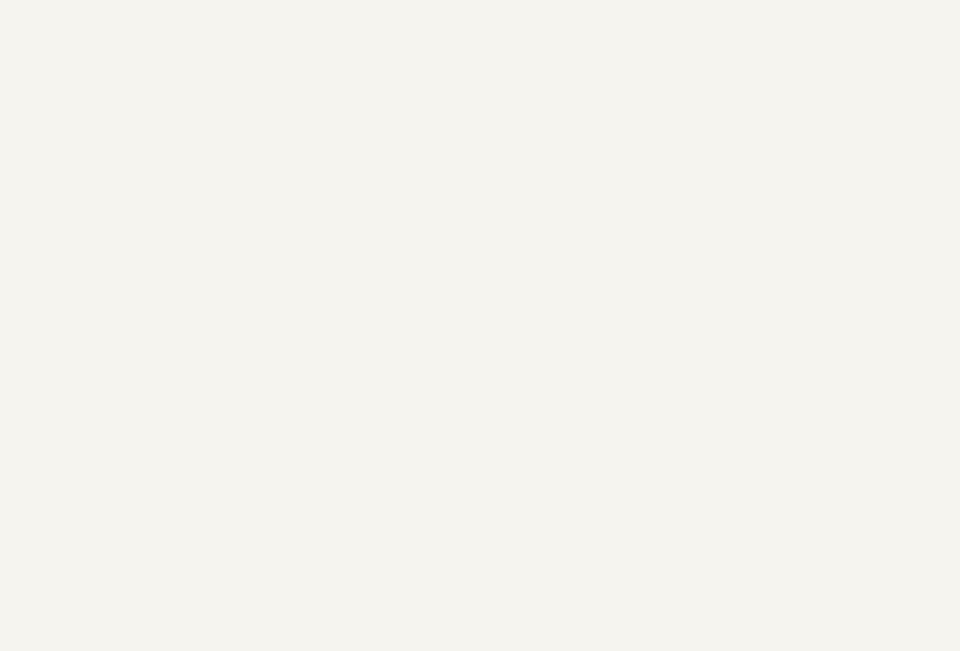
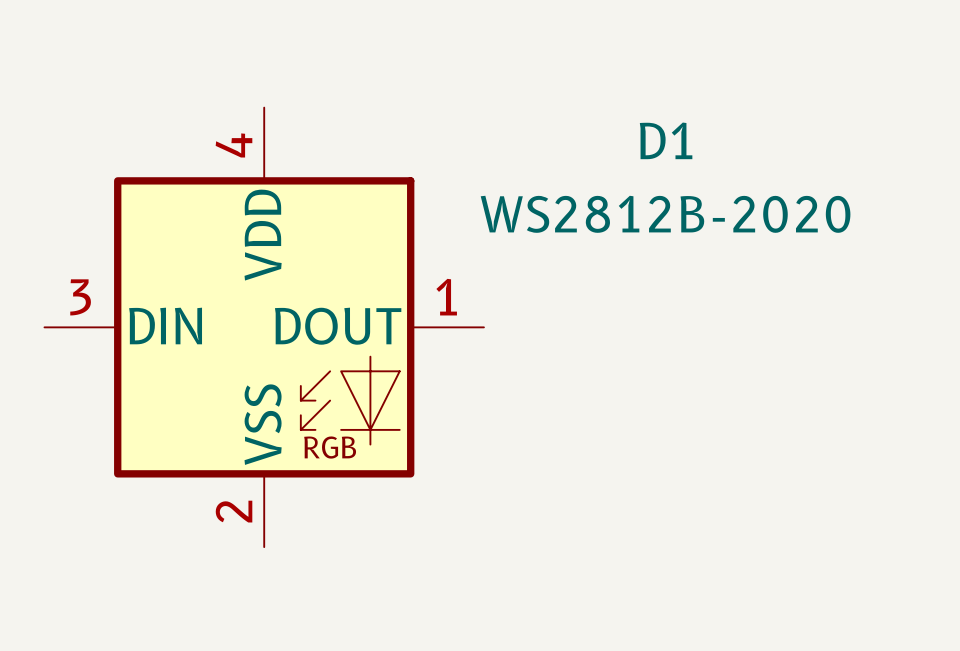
D1: none -> WS2812B-2020 (264, 327)

